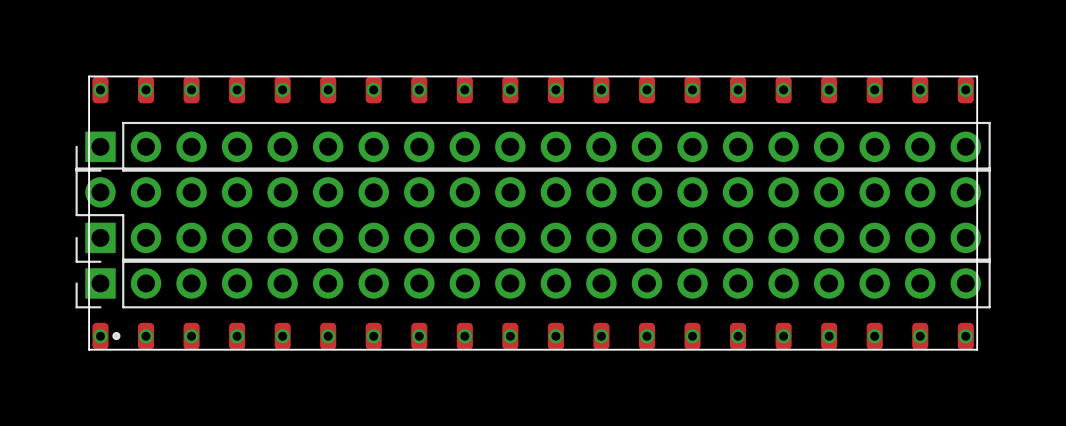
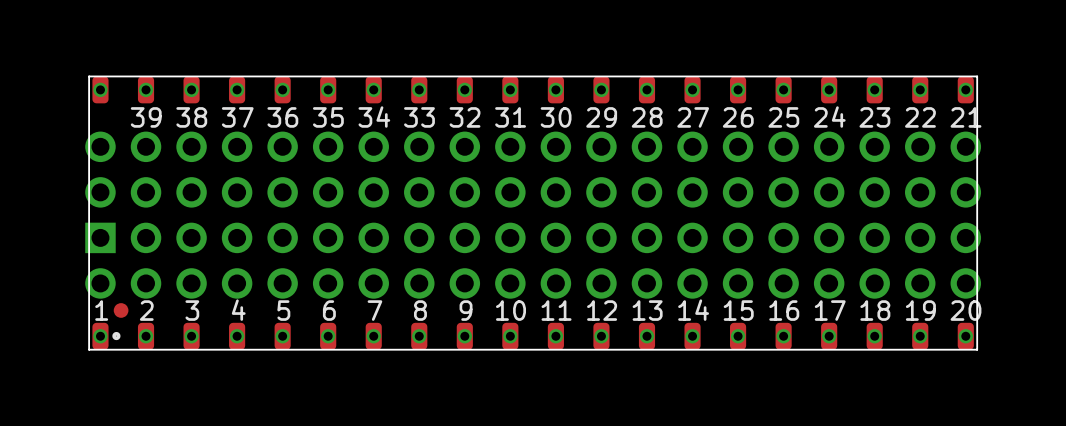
text: none -> 39 (146, 117)
text: none -> 38 (191, 117)
text: none -> 37 (237, 117)
text: none -> 36 (282, 117)
text: none -> 35 (328, 117)
text: none -> 34 (374, 117)
text: none -> 33 (419, 117)
text: none -> 32 (465, 117)
text: none -> 31 (510, 117)
text: none -> 30 (556, 117)
text: none -> 29 (601, 117)
text: none -> 28 (647, 117)
text: none -> 27 (693, 117)
text: none -> 26 (738, 117)
text: none -> 25 (783, 117)
text: none -> 24 (829, 117)
text: none -> 23 (874, 117)
text: none -> 22 (920, 117)
text: none -> 21 (965, 117)
part footprint: [75, 121, 991, 172] -> [85, 131, 982, 163]
part footprint: [75, 167, 991, 263] -> [85, 177, 982, 254]
part footprint: [75, 258, 991, 309] -> [85, 268, 982, 299]
drawing: none -> [113, 303, 129, 318]
text: none -> 1 (101, 310)
text: none -> 2 (146, 310)
text: none -> 3 (192, 310)
text: none -> 4 (238, 310)
text: none -> 5 (283, 310)
text: none -> 6 (329, 310)
text: none -> 7 (374, 310)
text: none -> 8 (420, 310)
text: none -> 9 (466, 310)
text: none -> 10 (510, 310)
text: none -> 11 (556, 310)
text: none -> 12 (602, 310)
text: none -> 13 (647, 310)
text: none -> 14 (693, 310)
text: none -> 15 (738, 310)
text: none -> 16 (784, 310)
text: none -> 17 (830, 310)
text: none -> 18 (875, 310)
text: none -> 19 (920, 310)
text: none -> 20 (965, 310)

